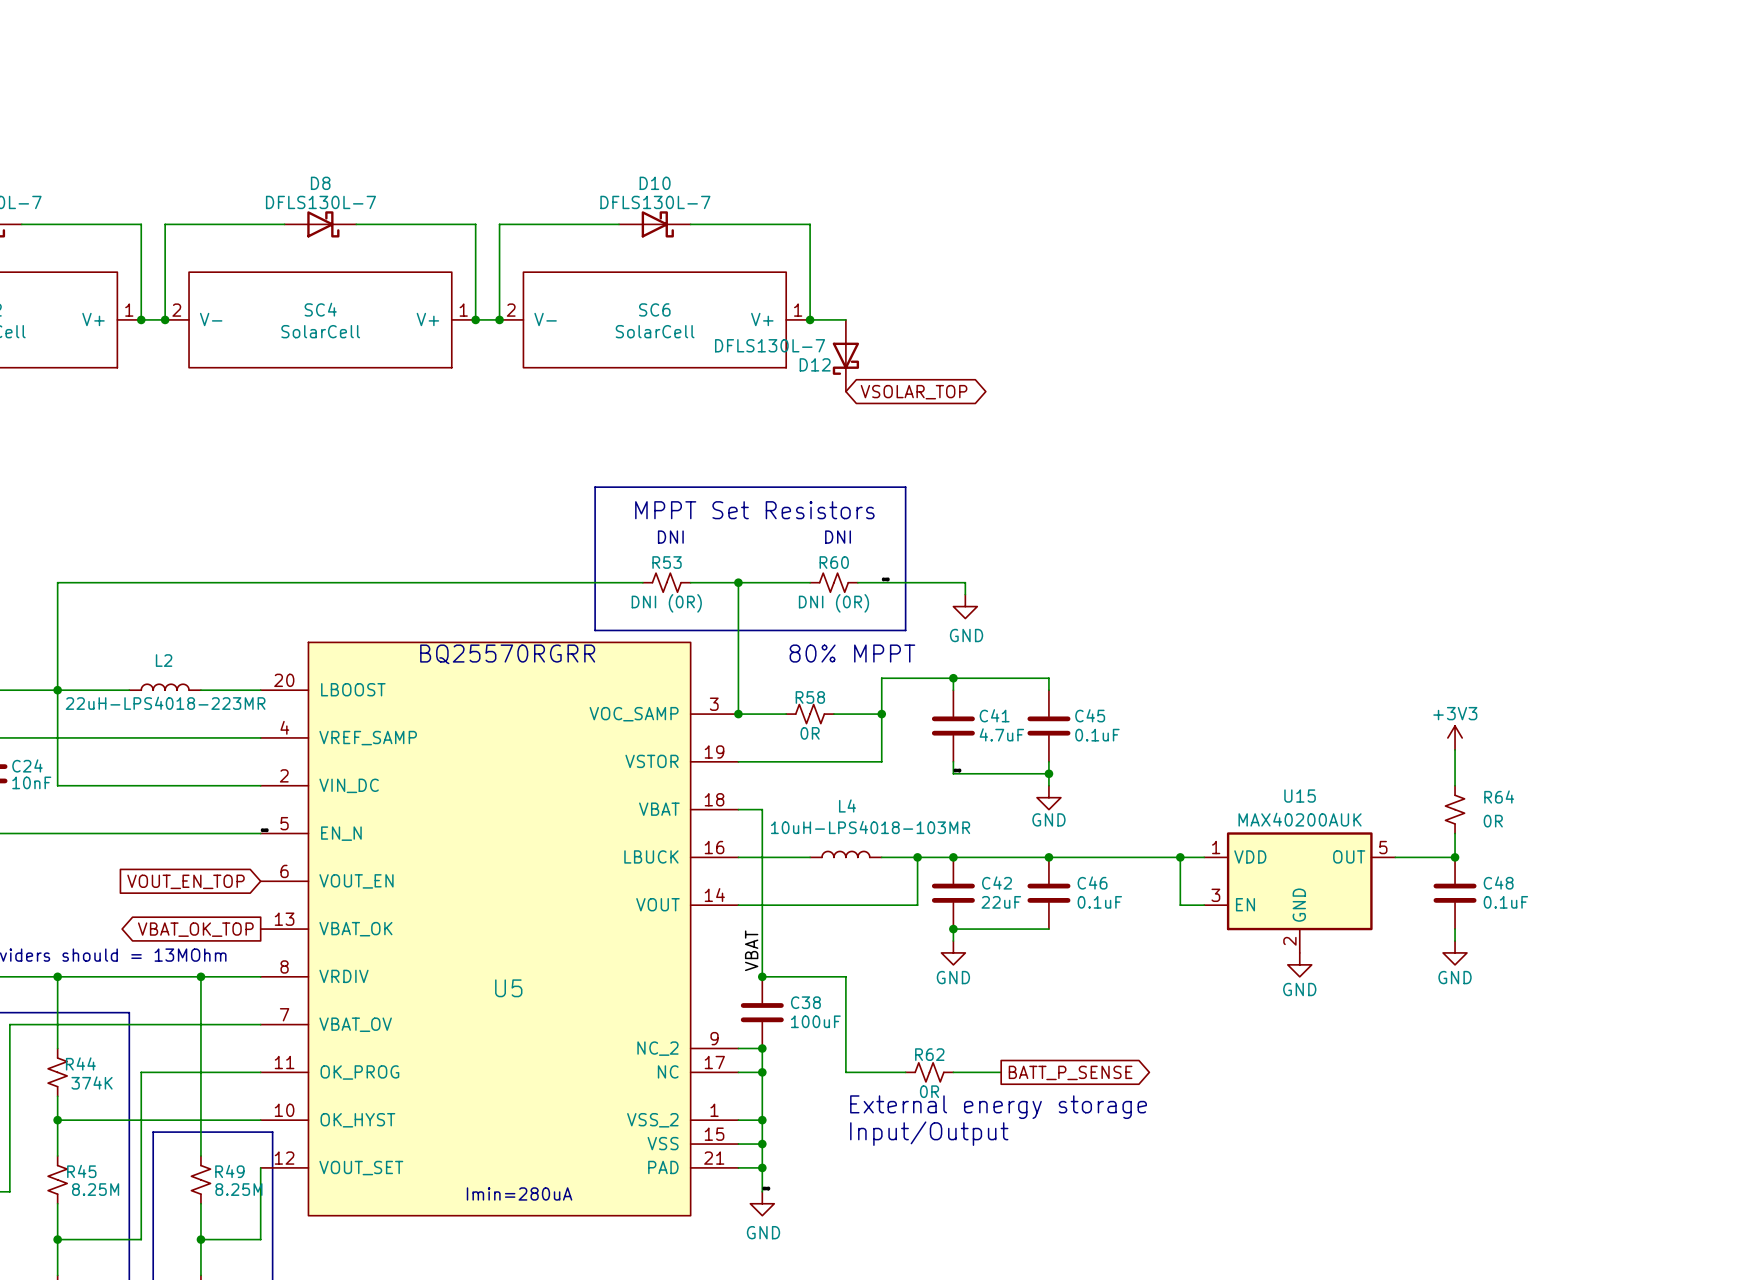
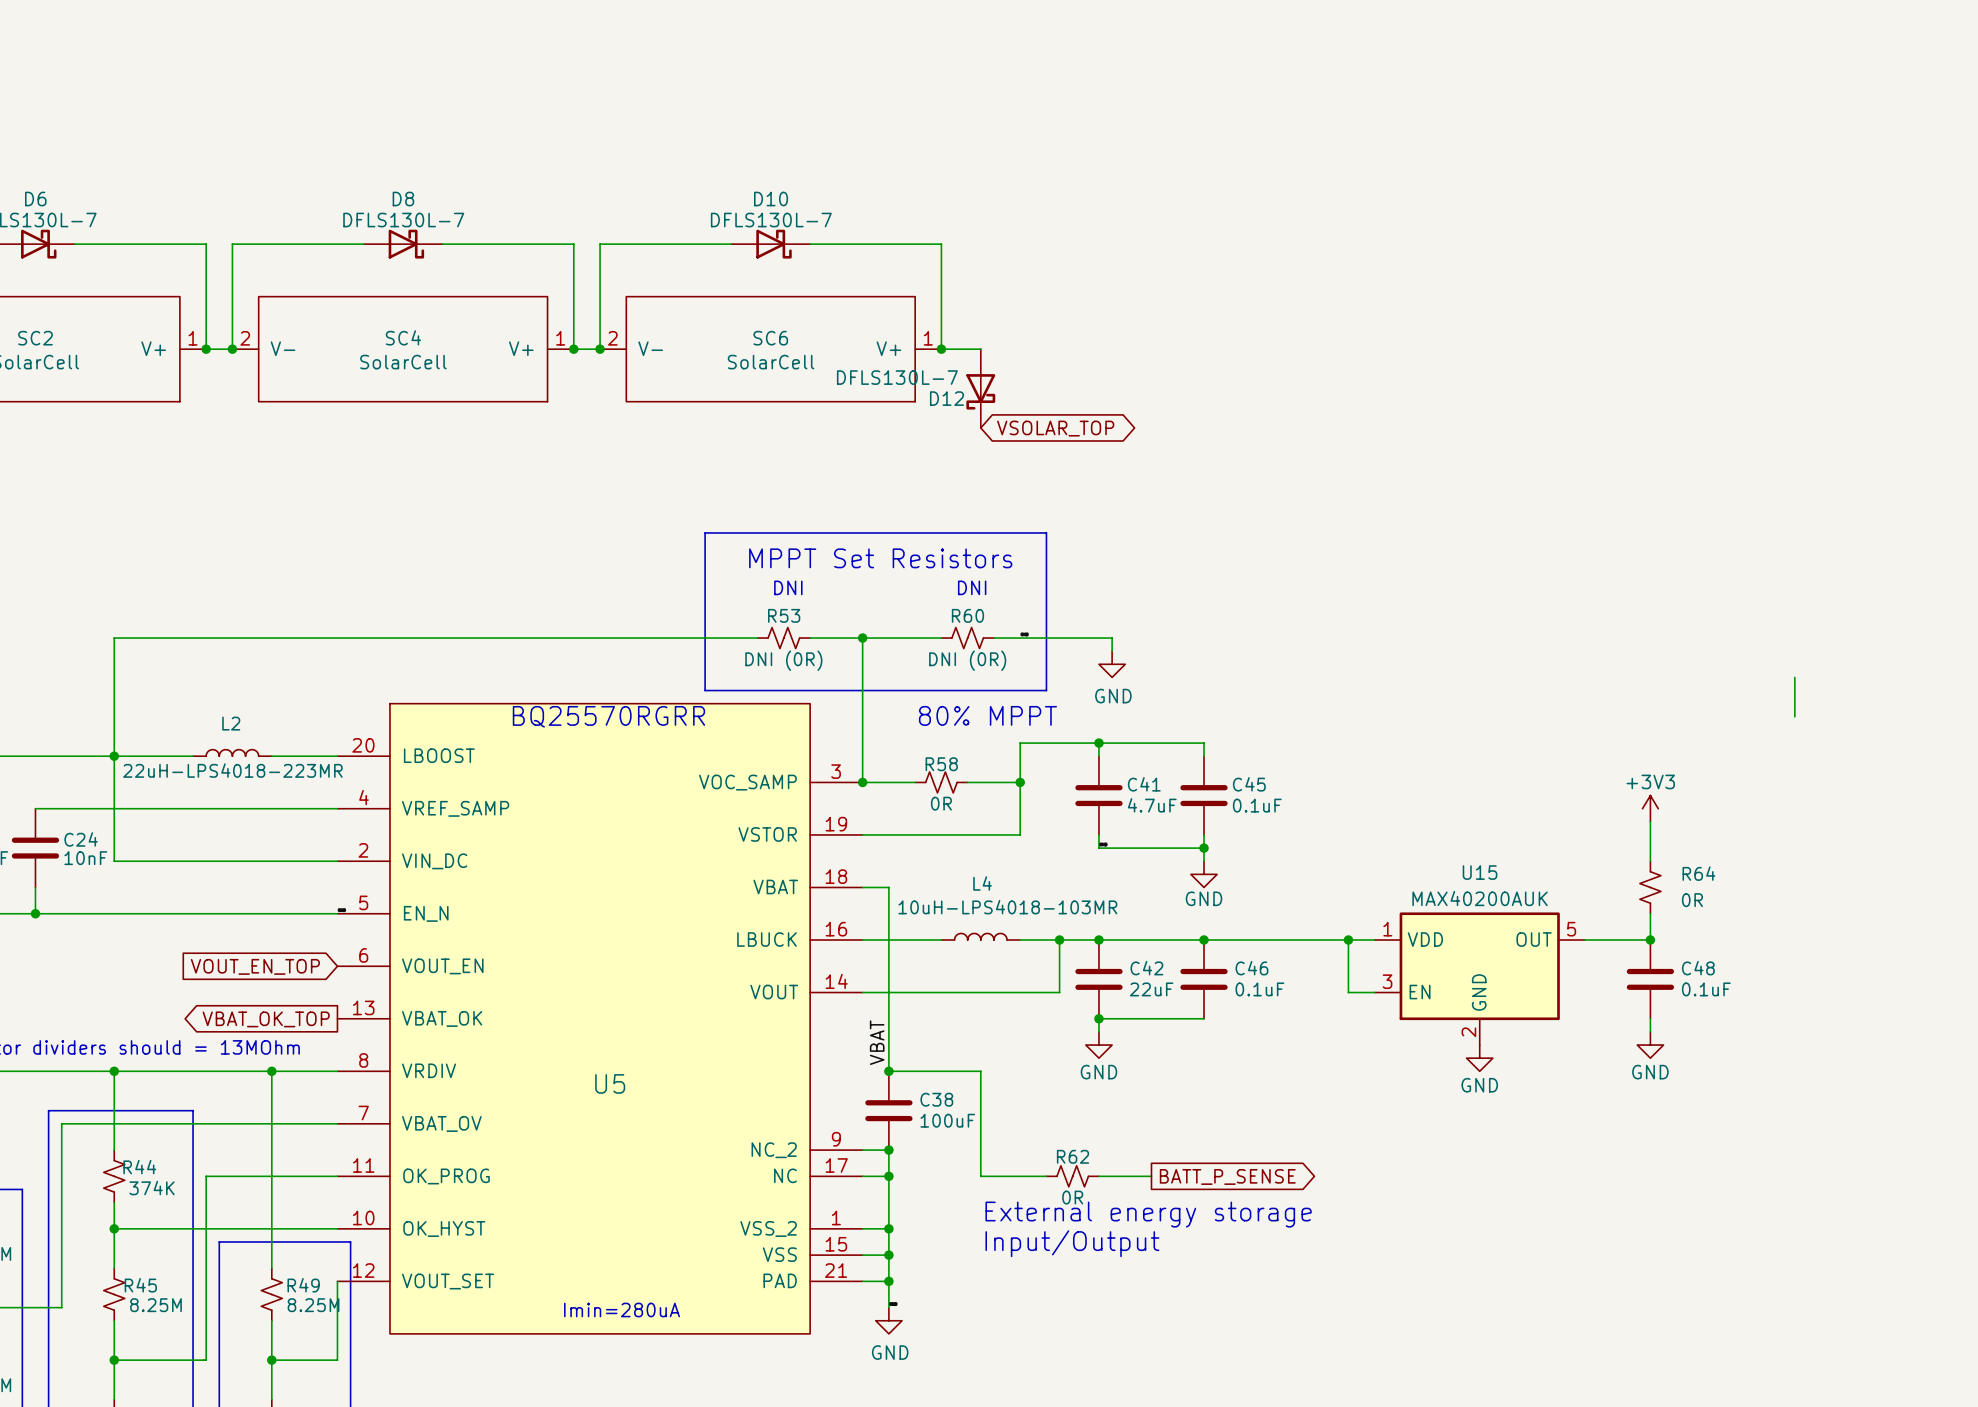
wire: none -> (1794, 677) (1794, 716)

